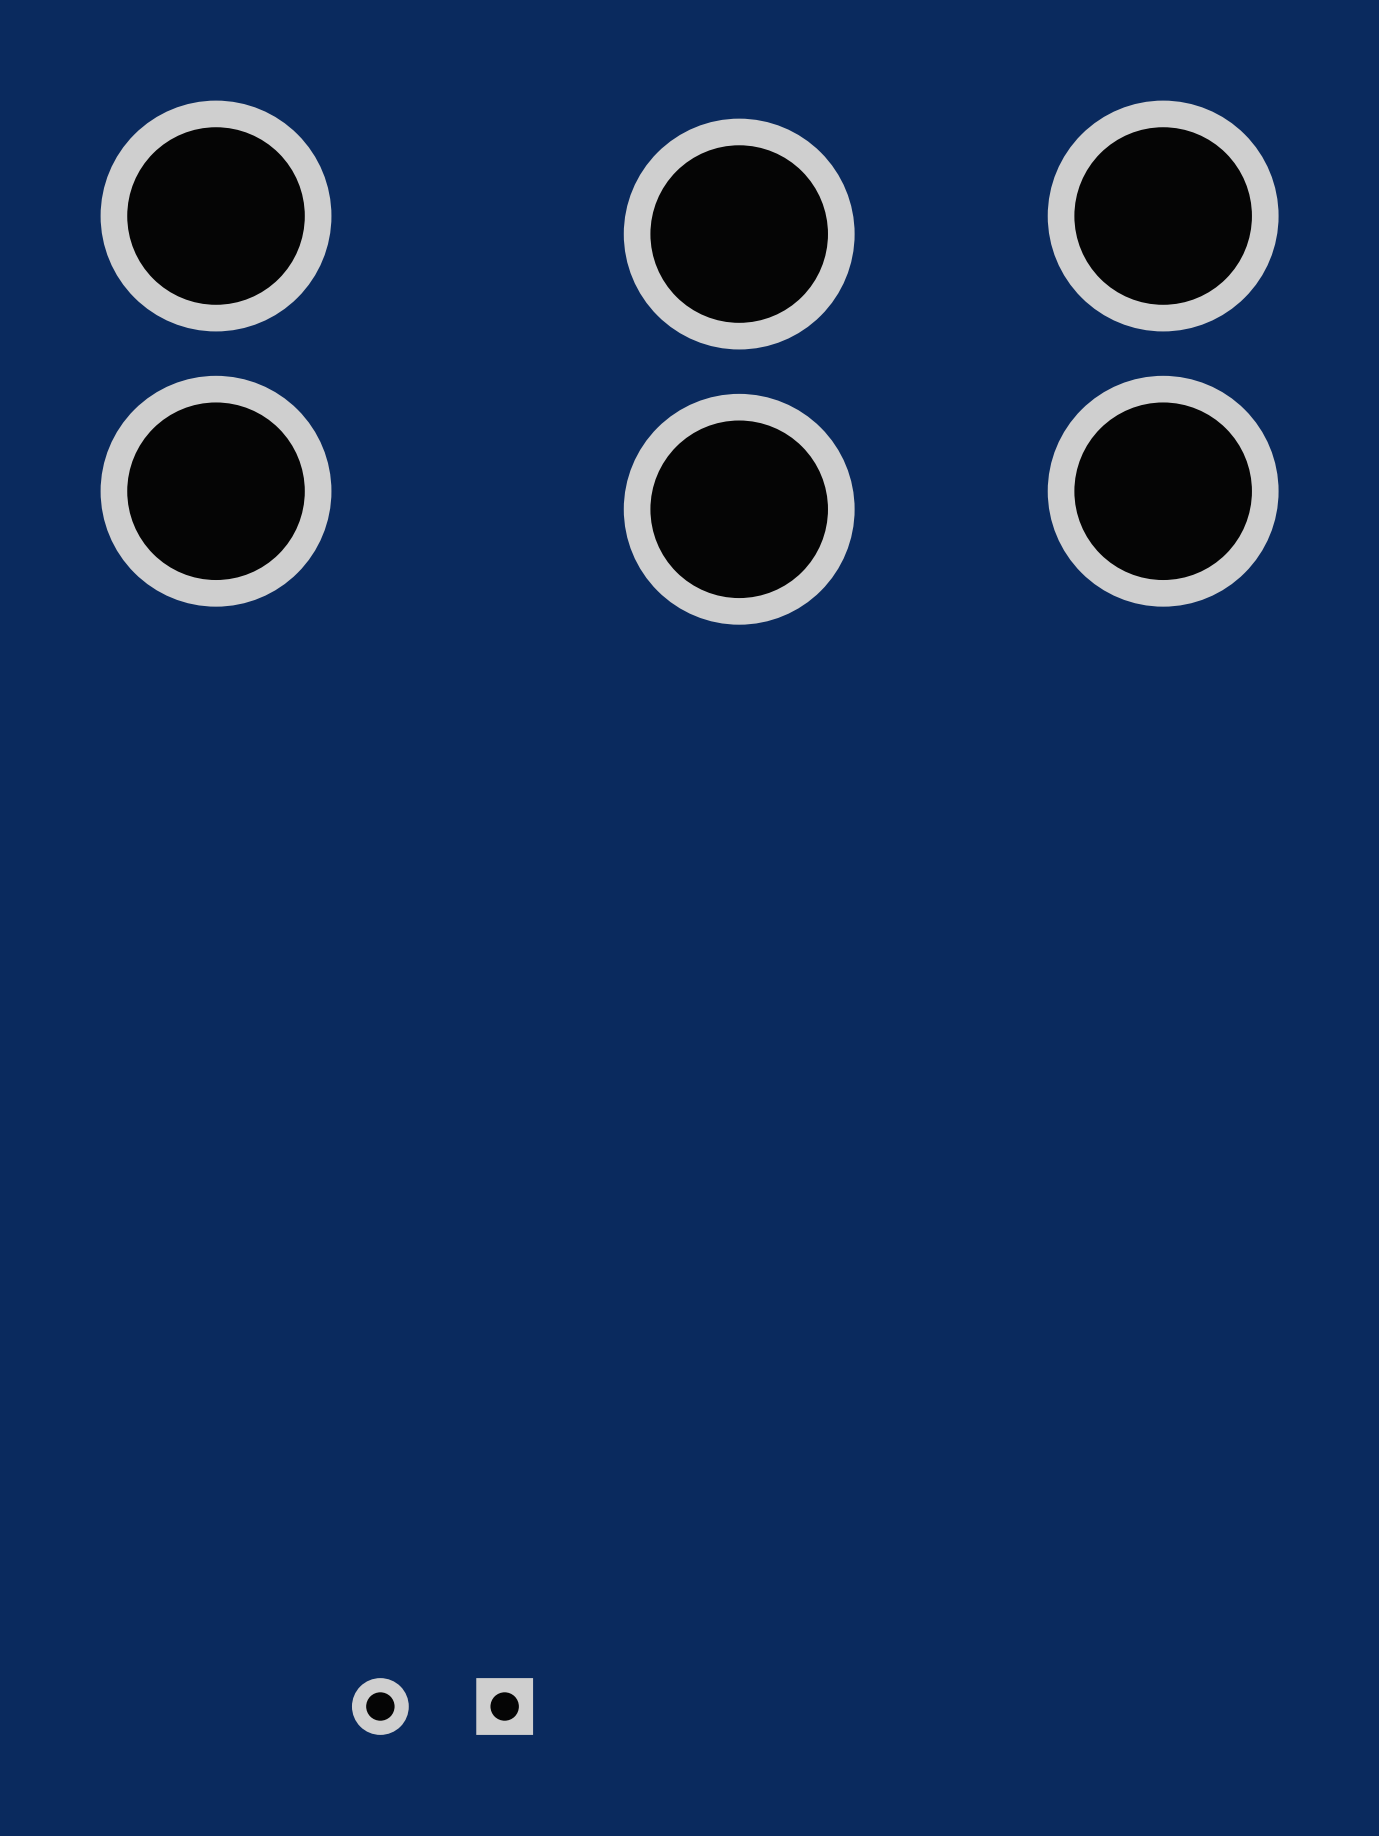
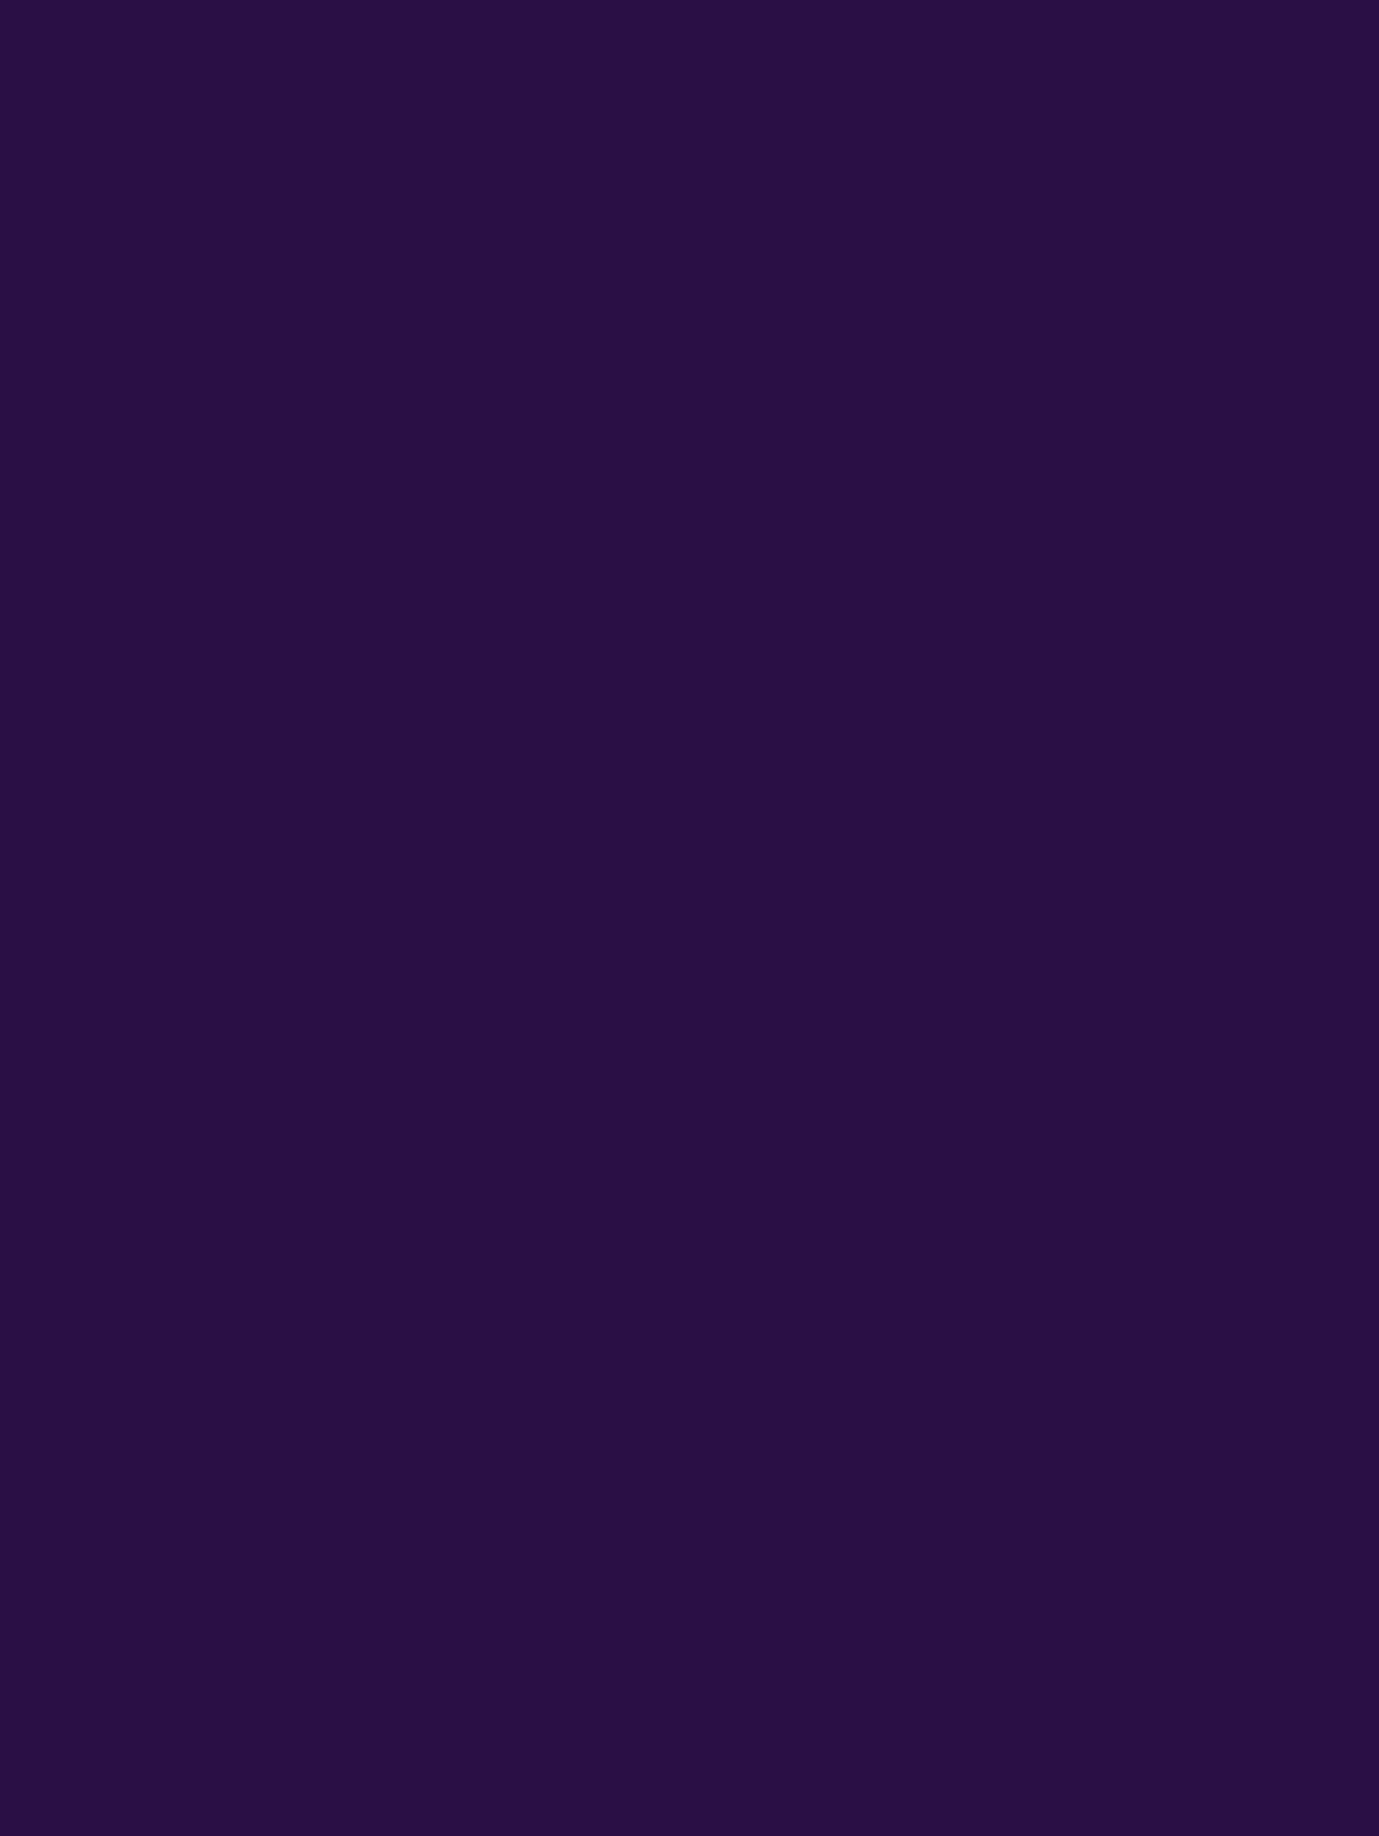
part: (216, 353) -> none
part: (1163, 353) -> none
part: (739, 371) -> none
part: (442, 1706) -> none

